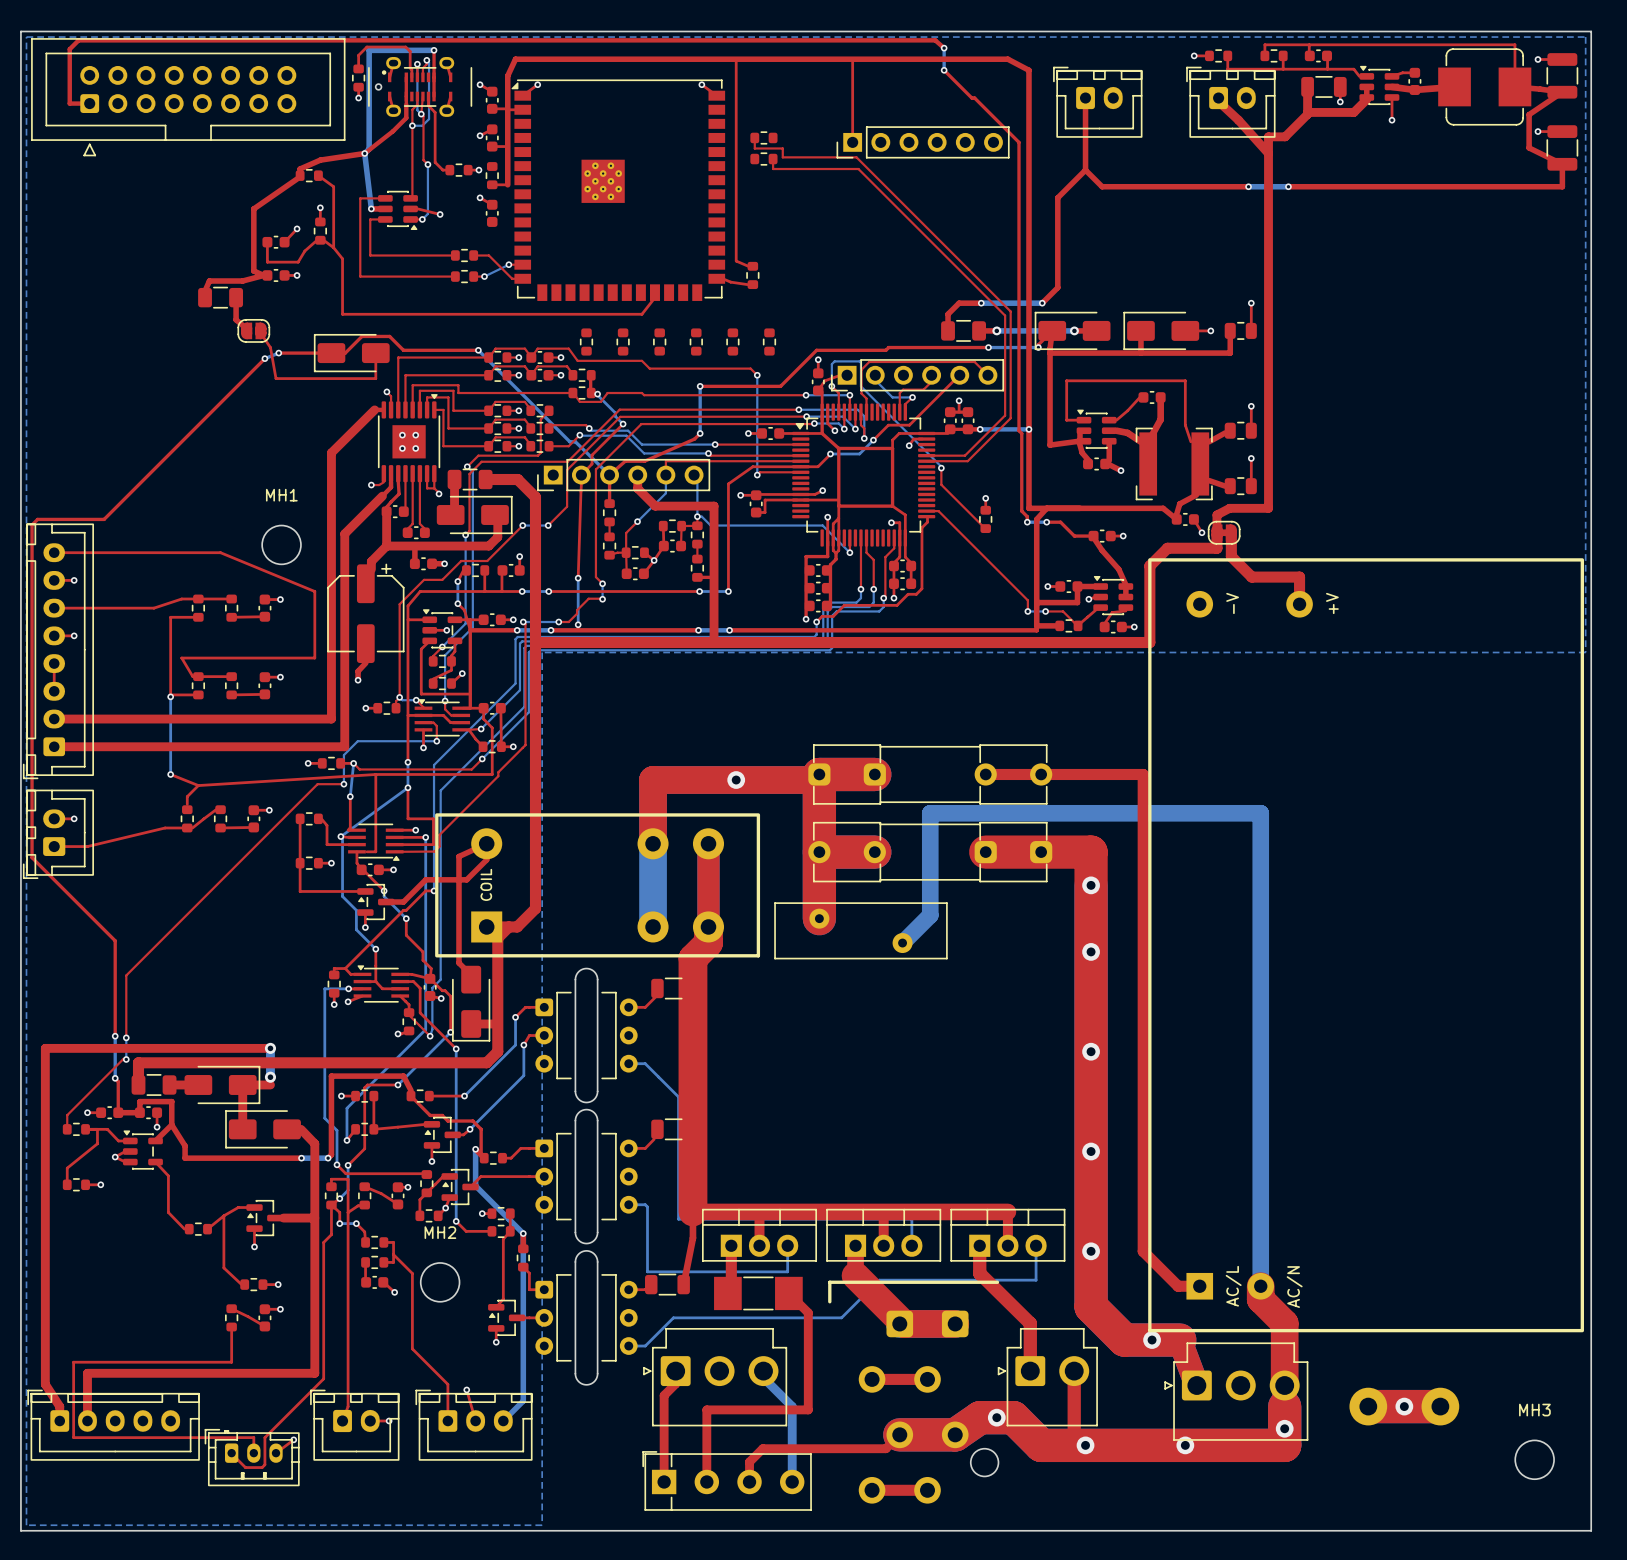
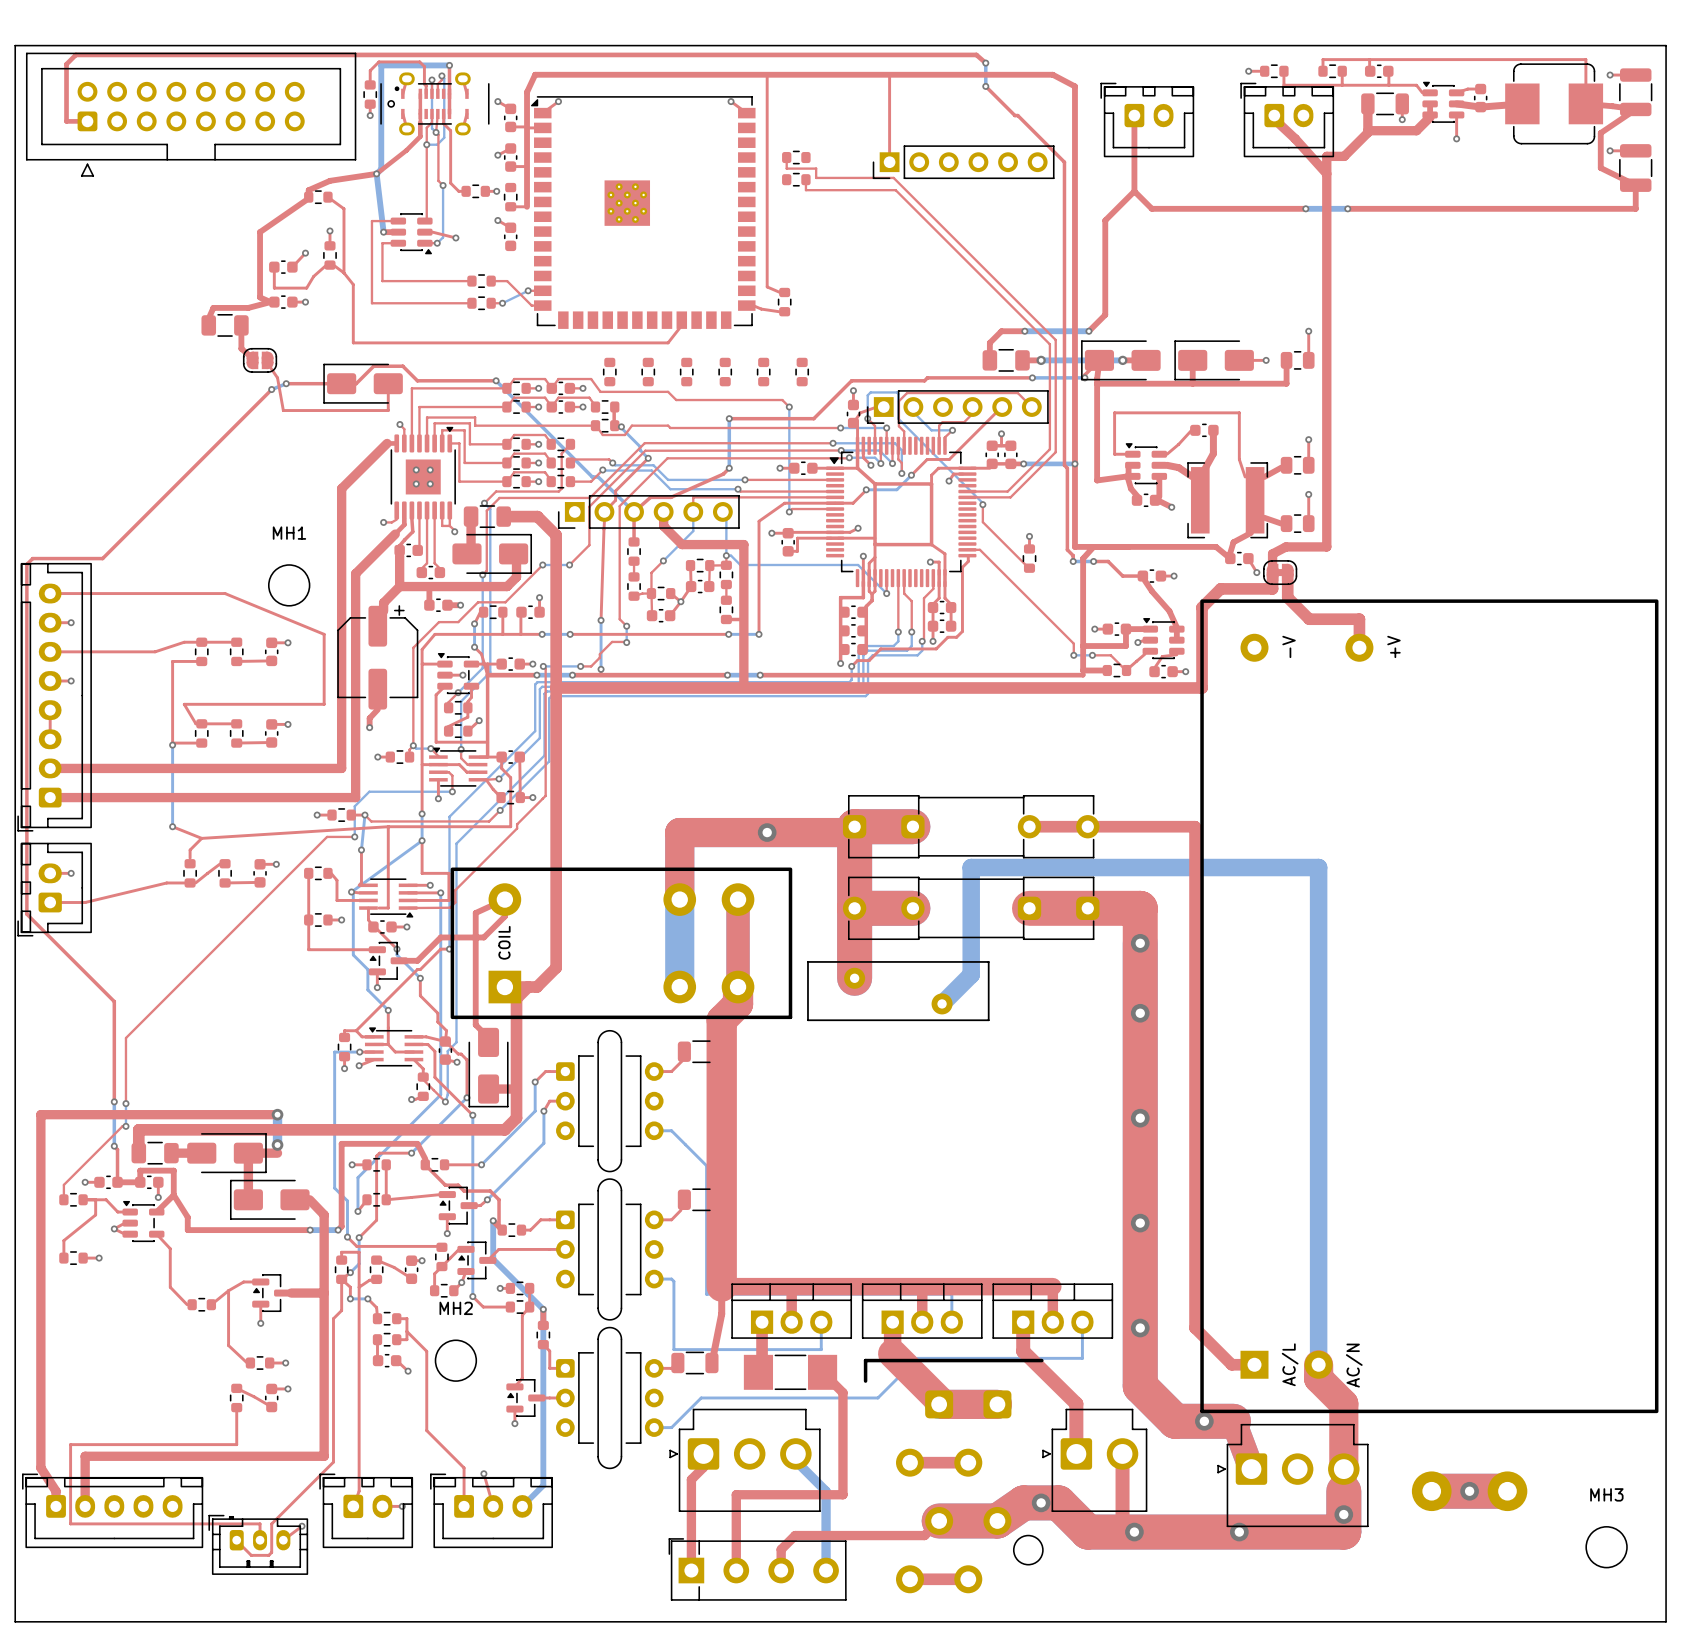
bottom zone outline: (26, 37) (1585, 37) (1585, 652) (542, 652) (542, 1525) (26, 1525) (26, 37) -> none

